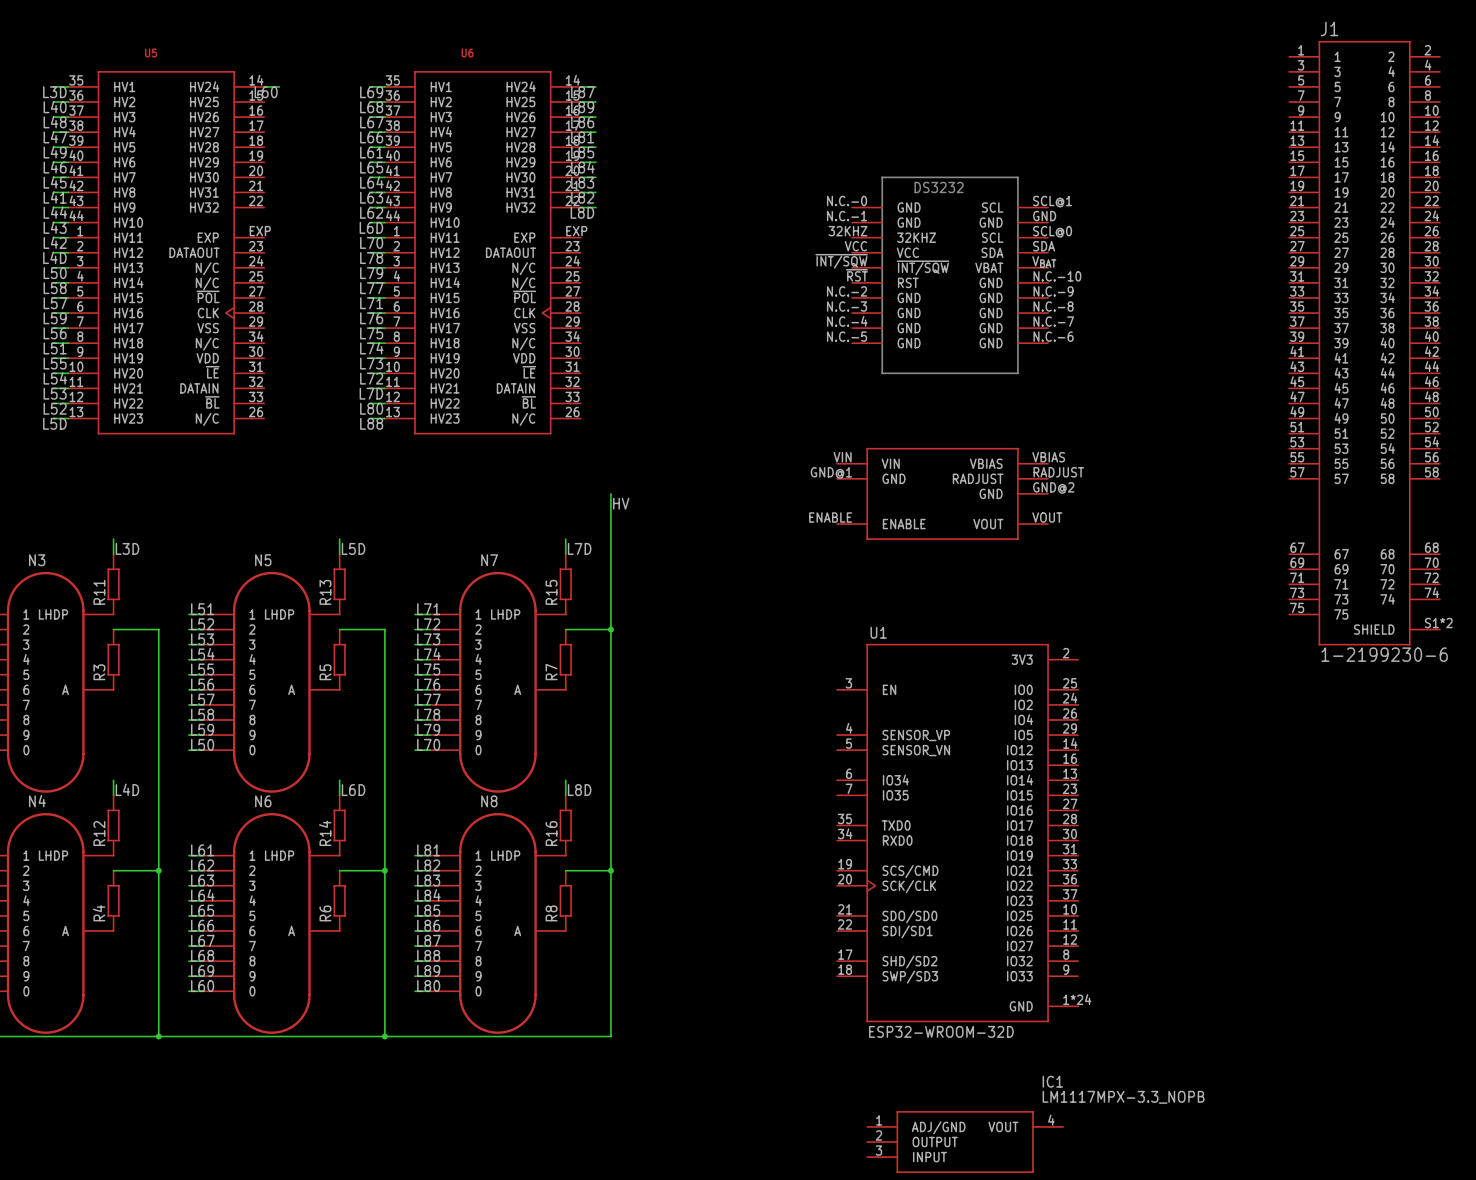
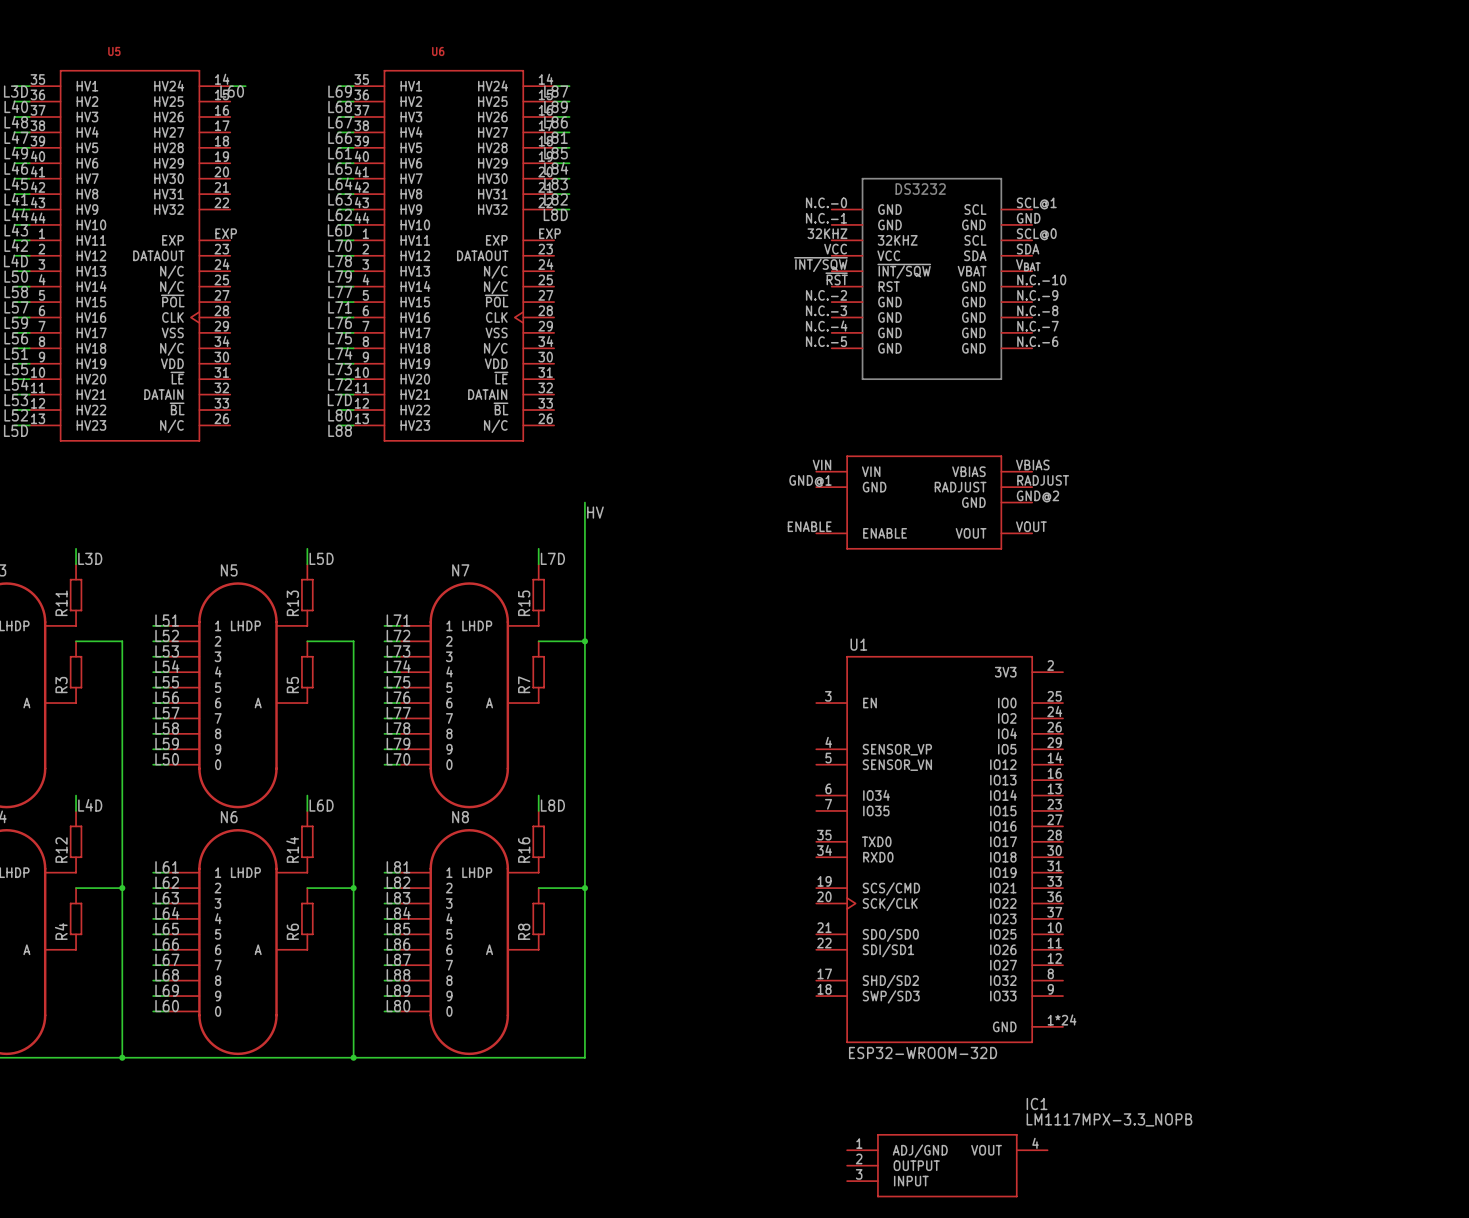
J1: 1-2199230-6 (1364, 343) -> none

